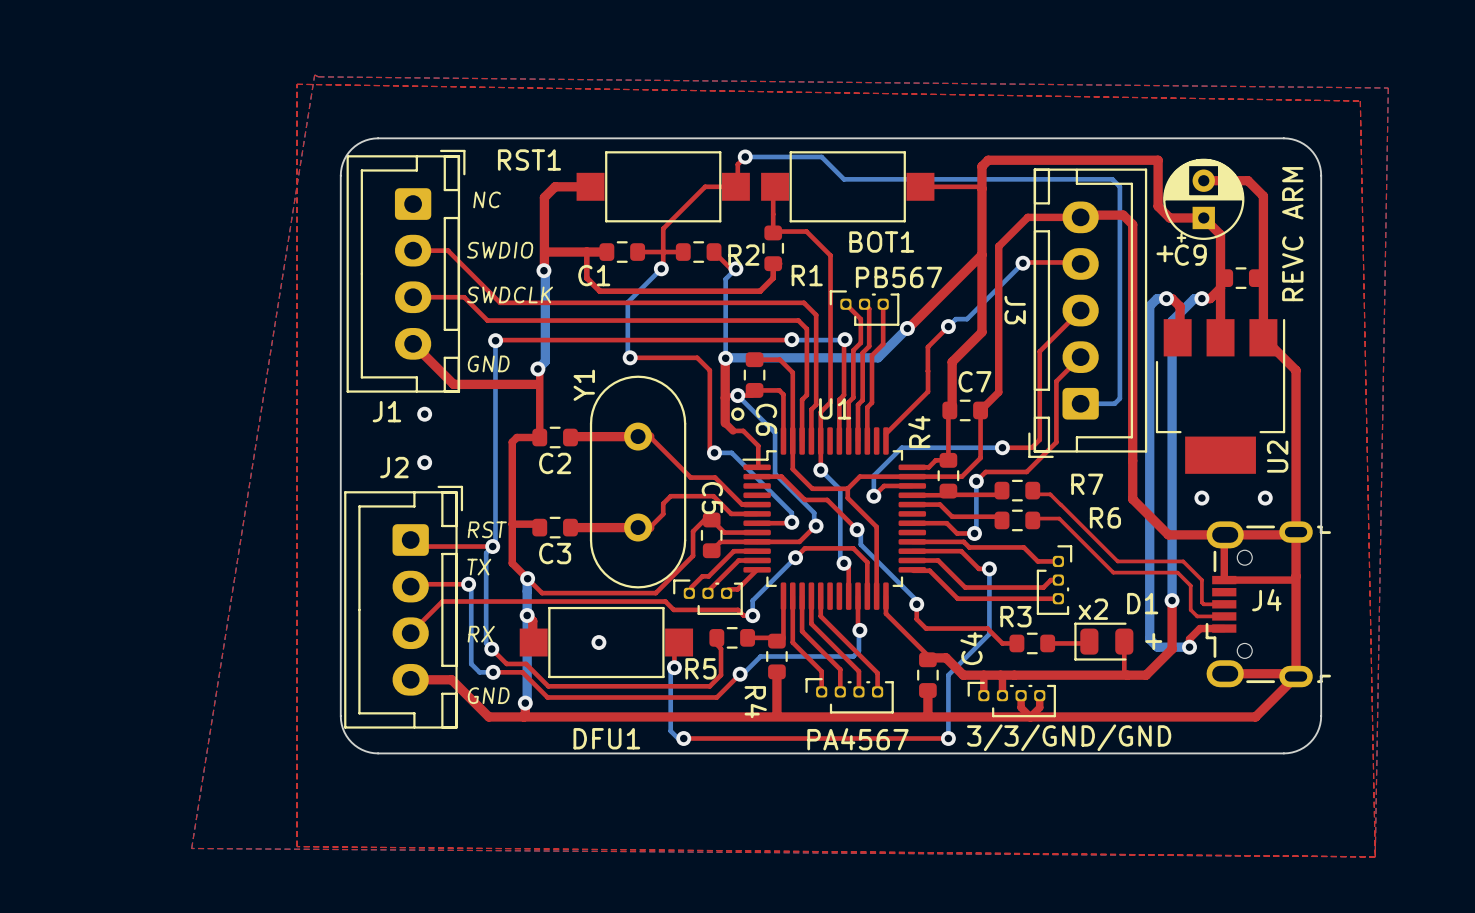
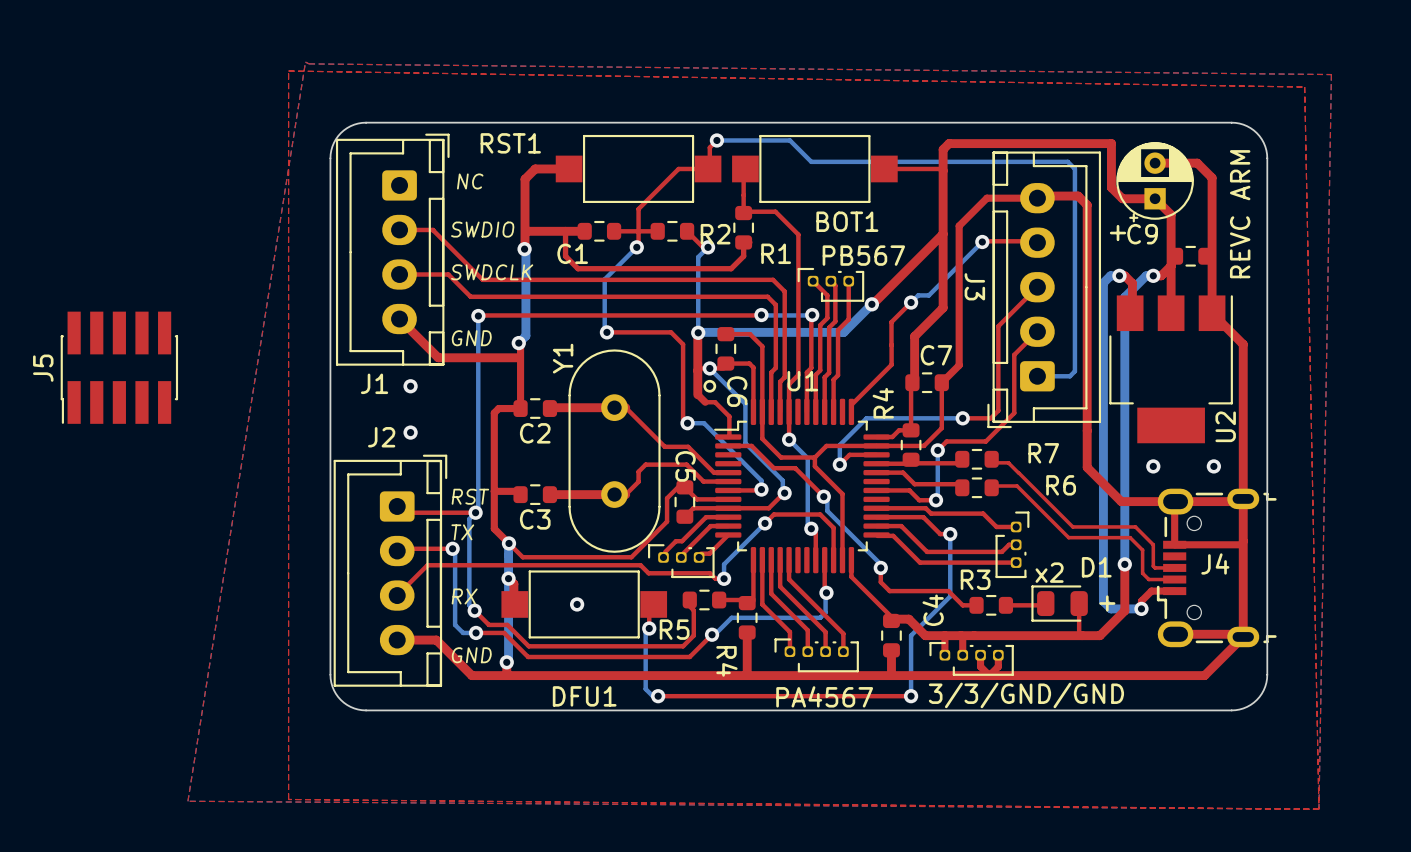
J5: none -> (119, 367)

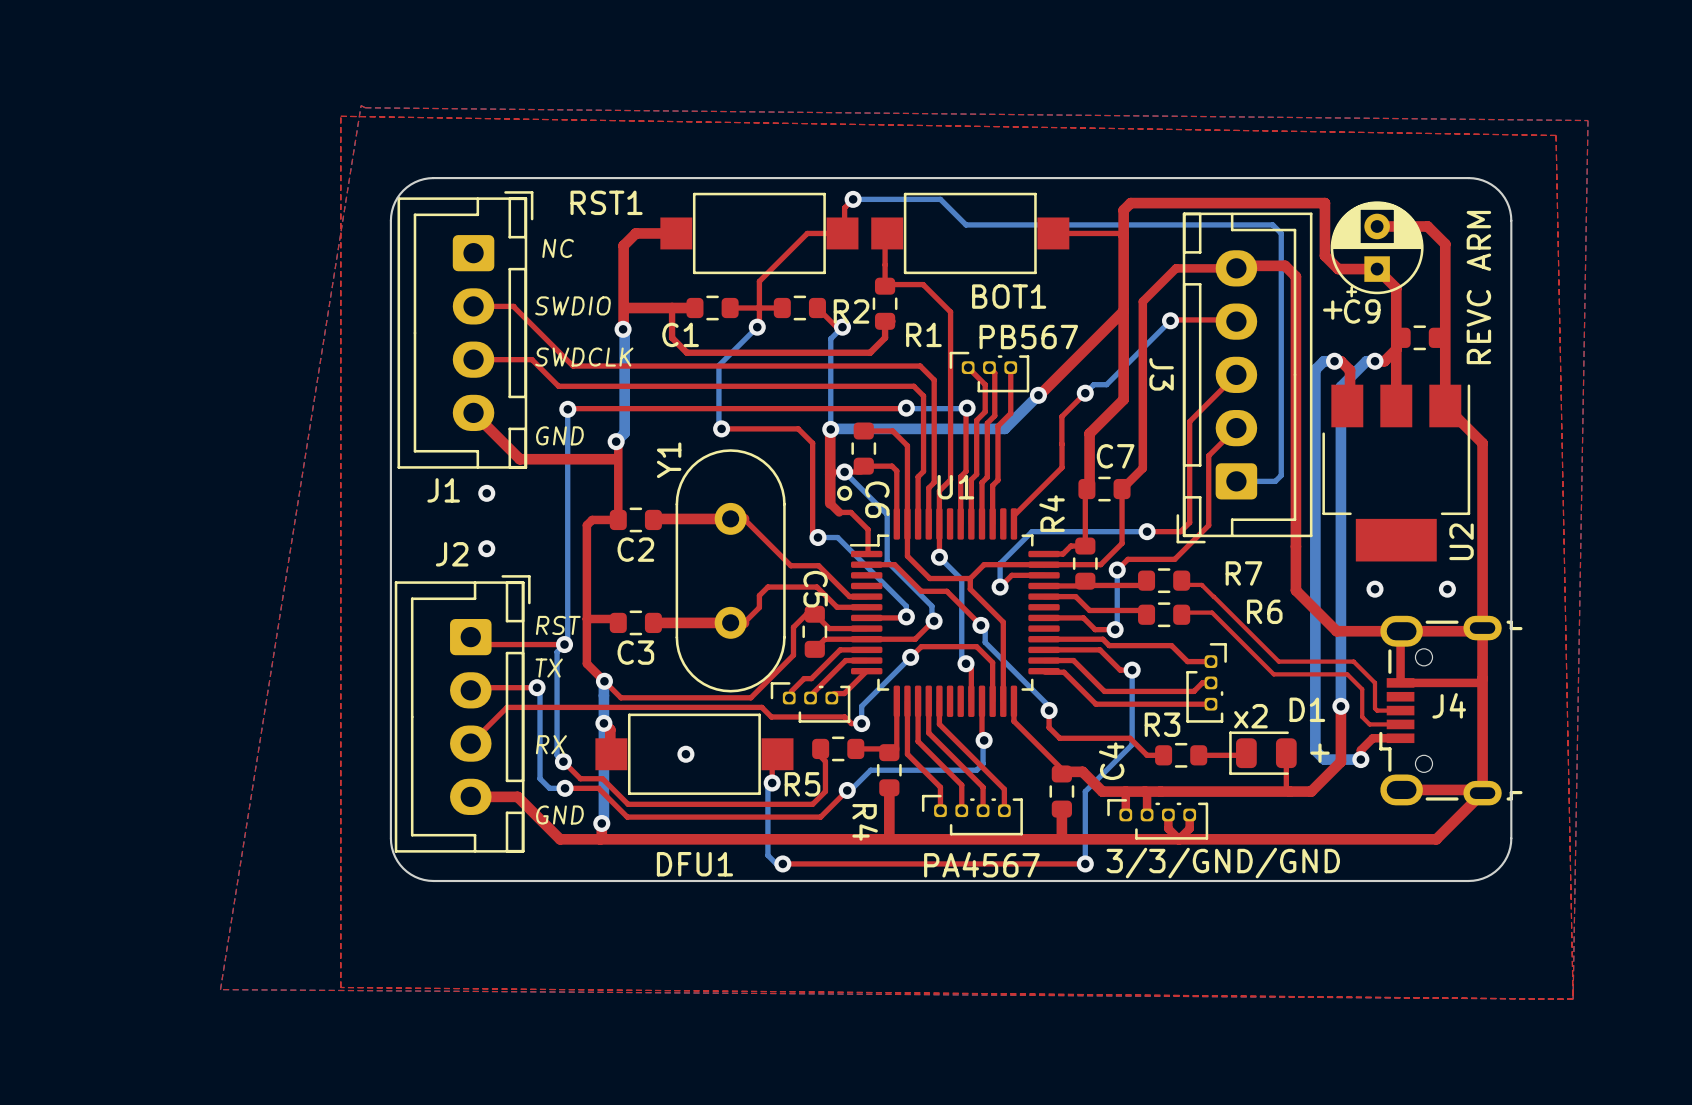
J5: (119, 367) -> none

